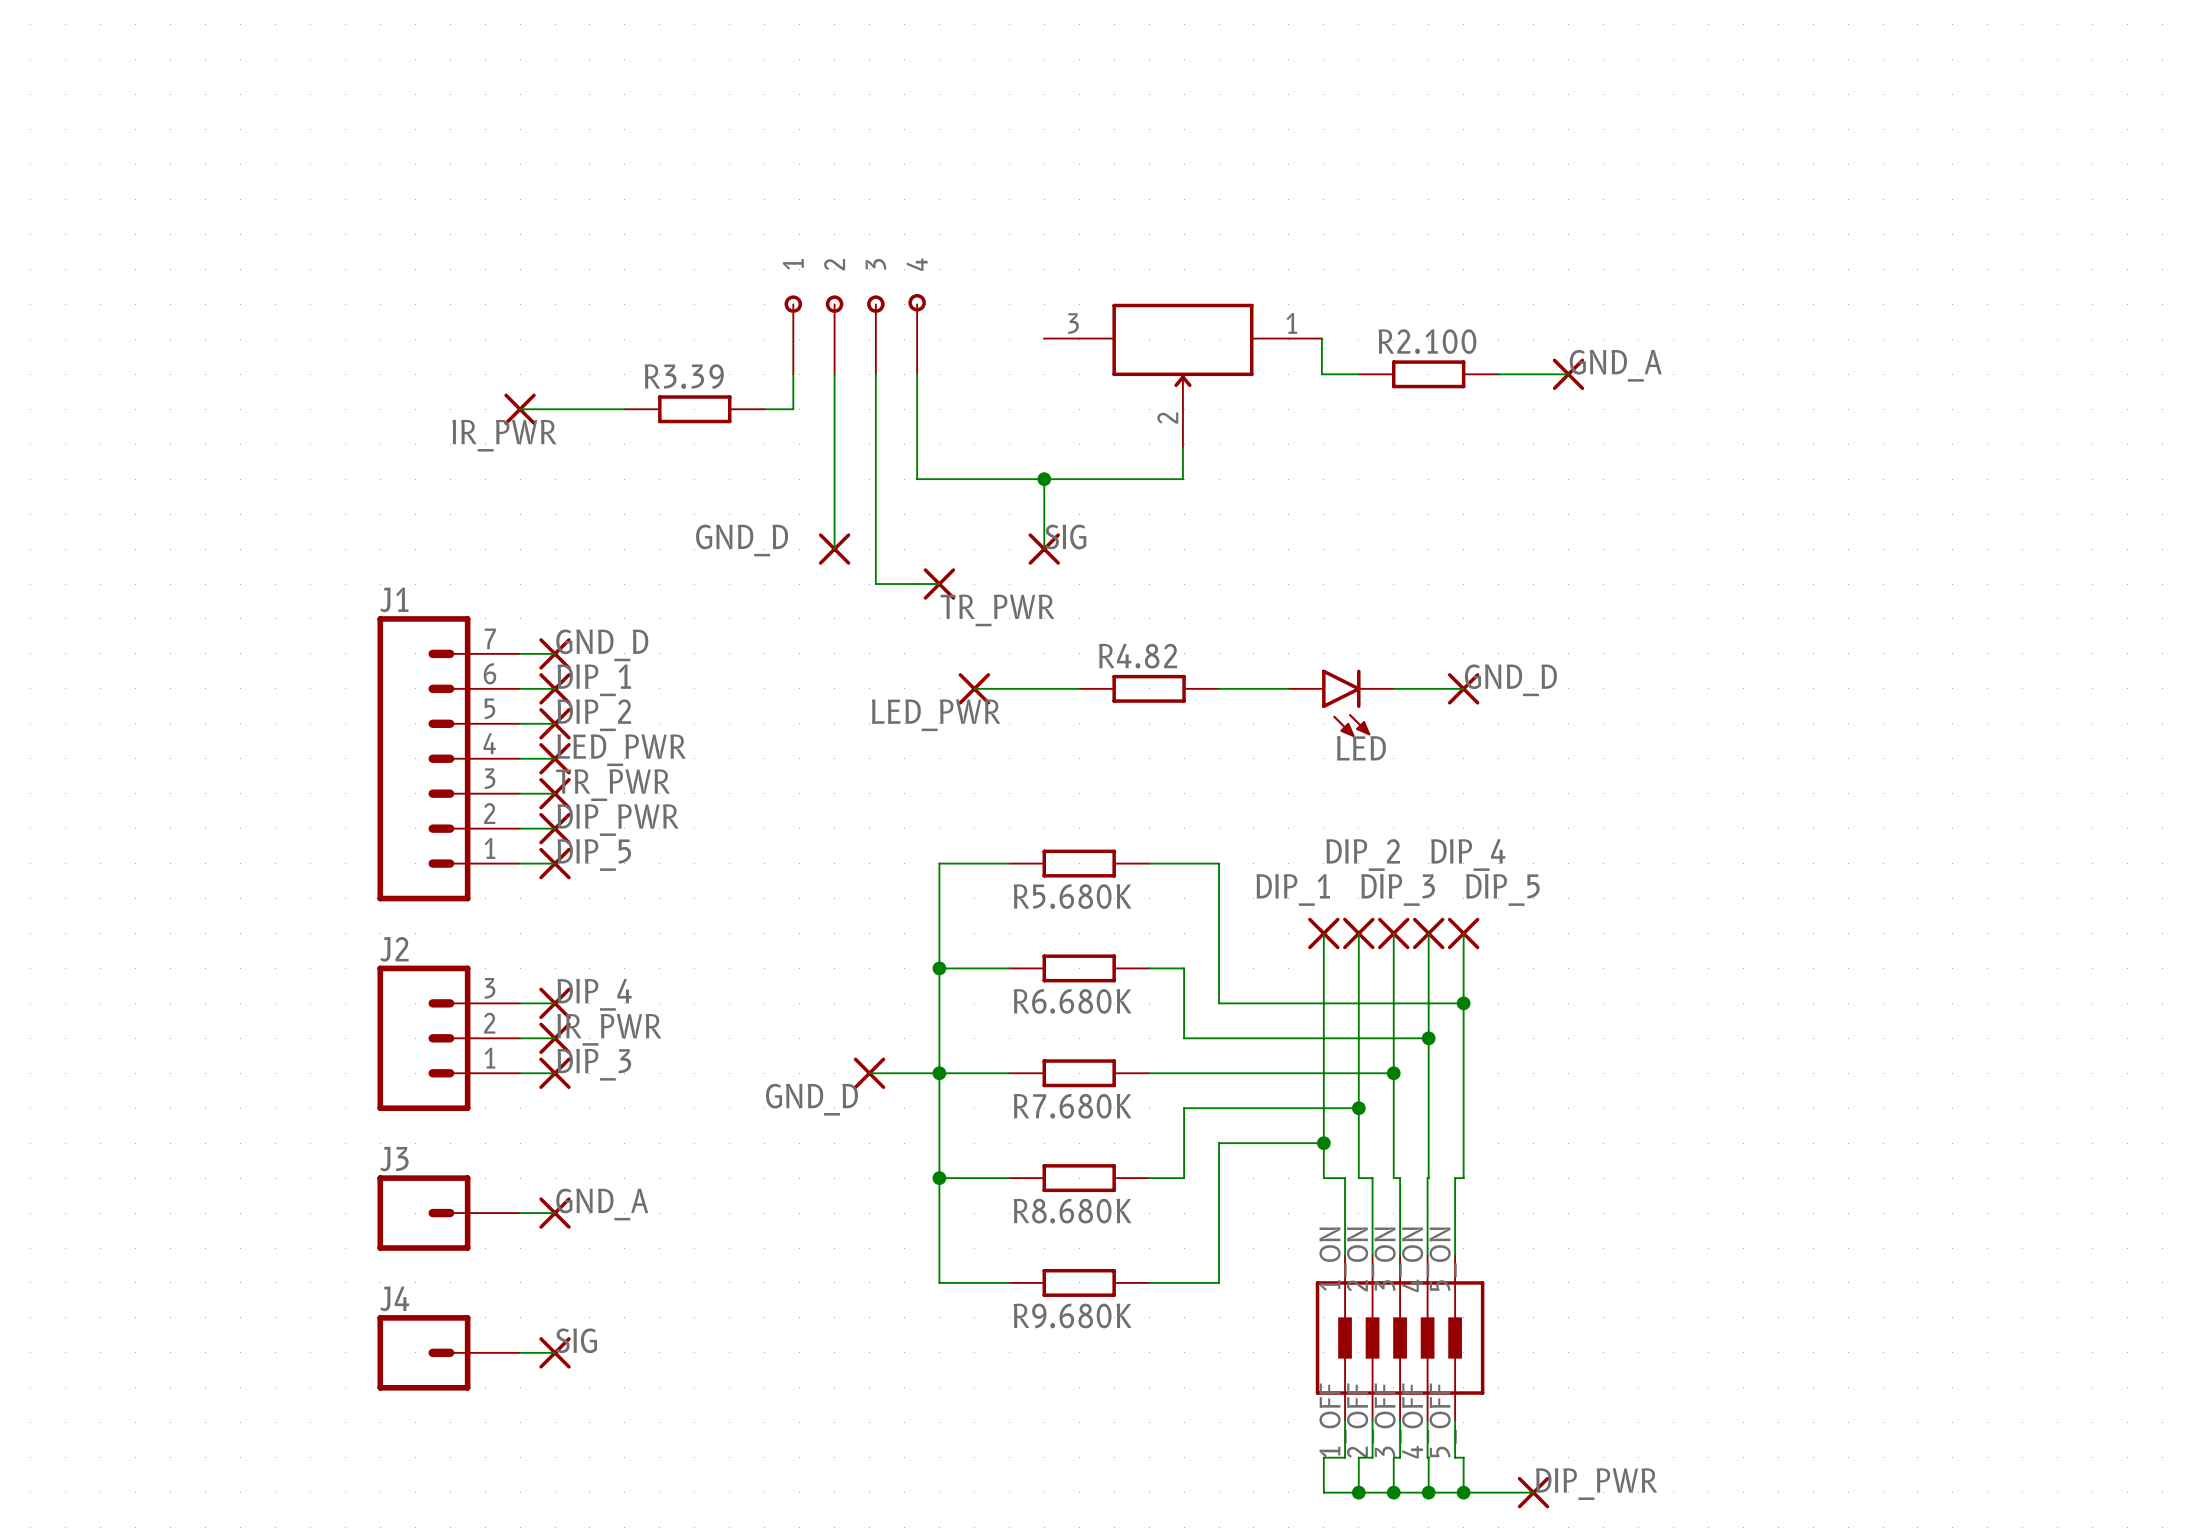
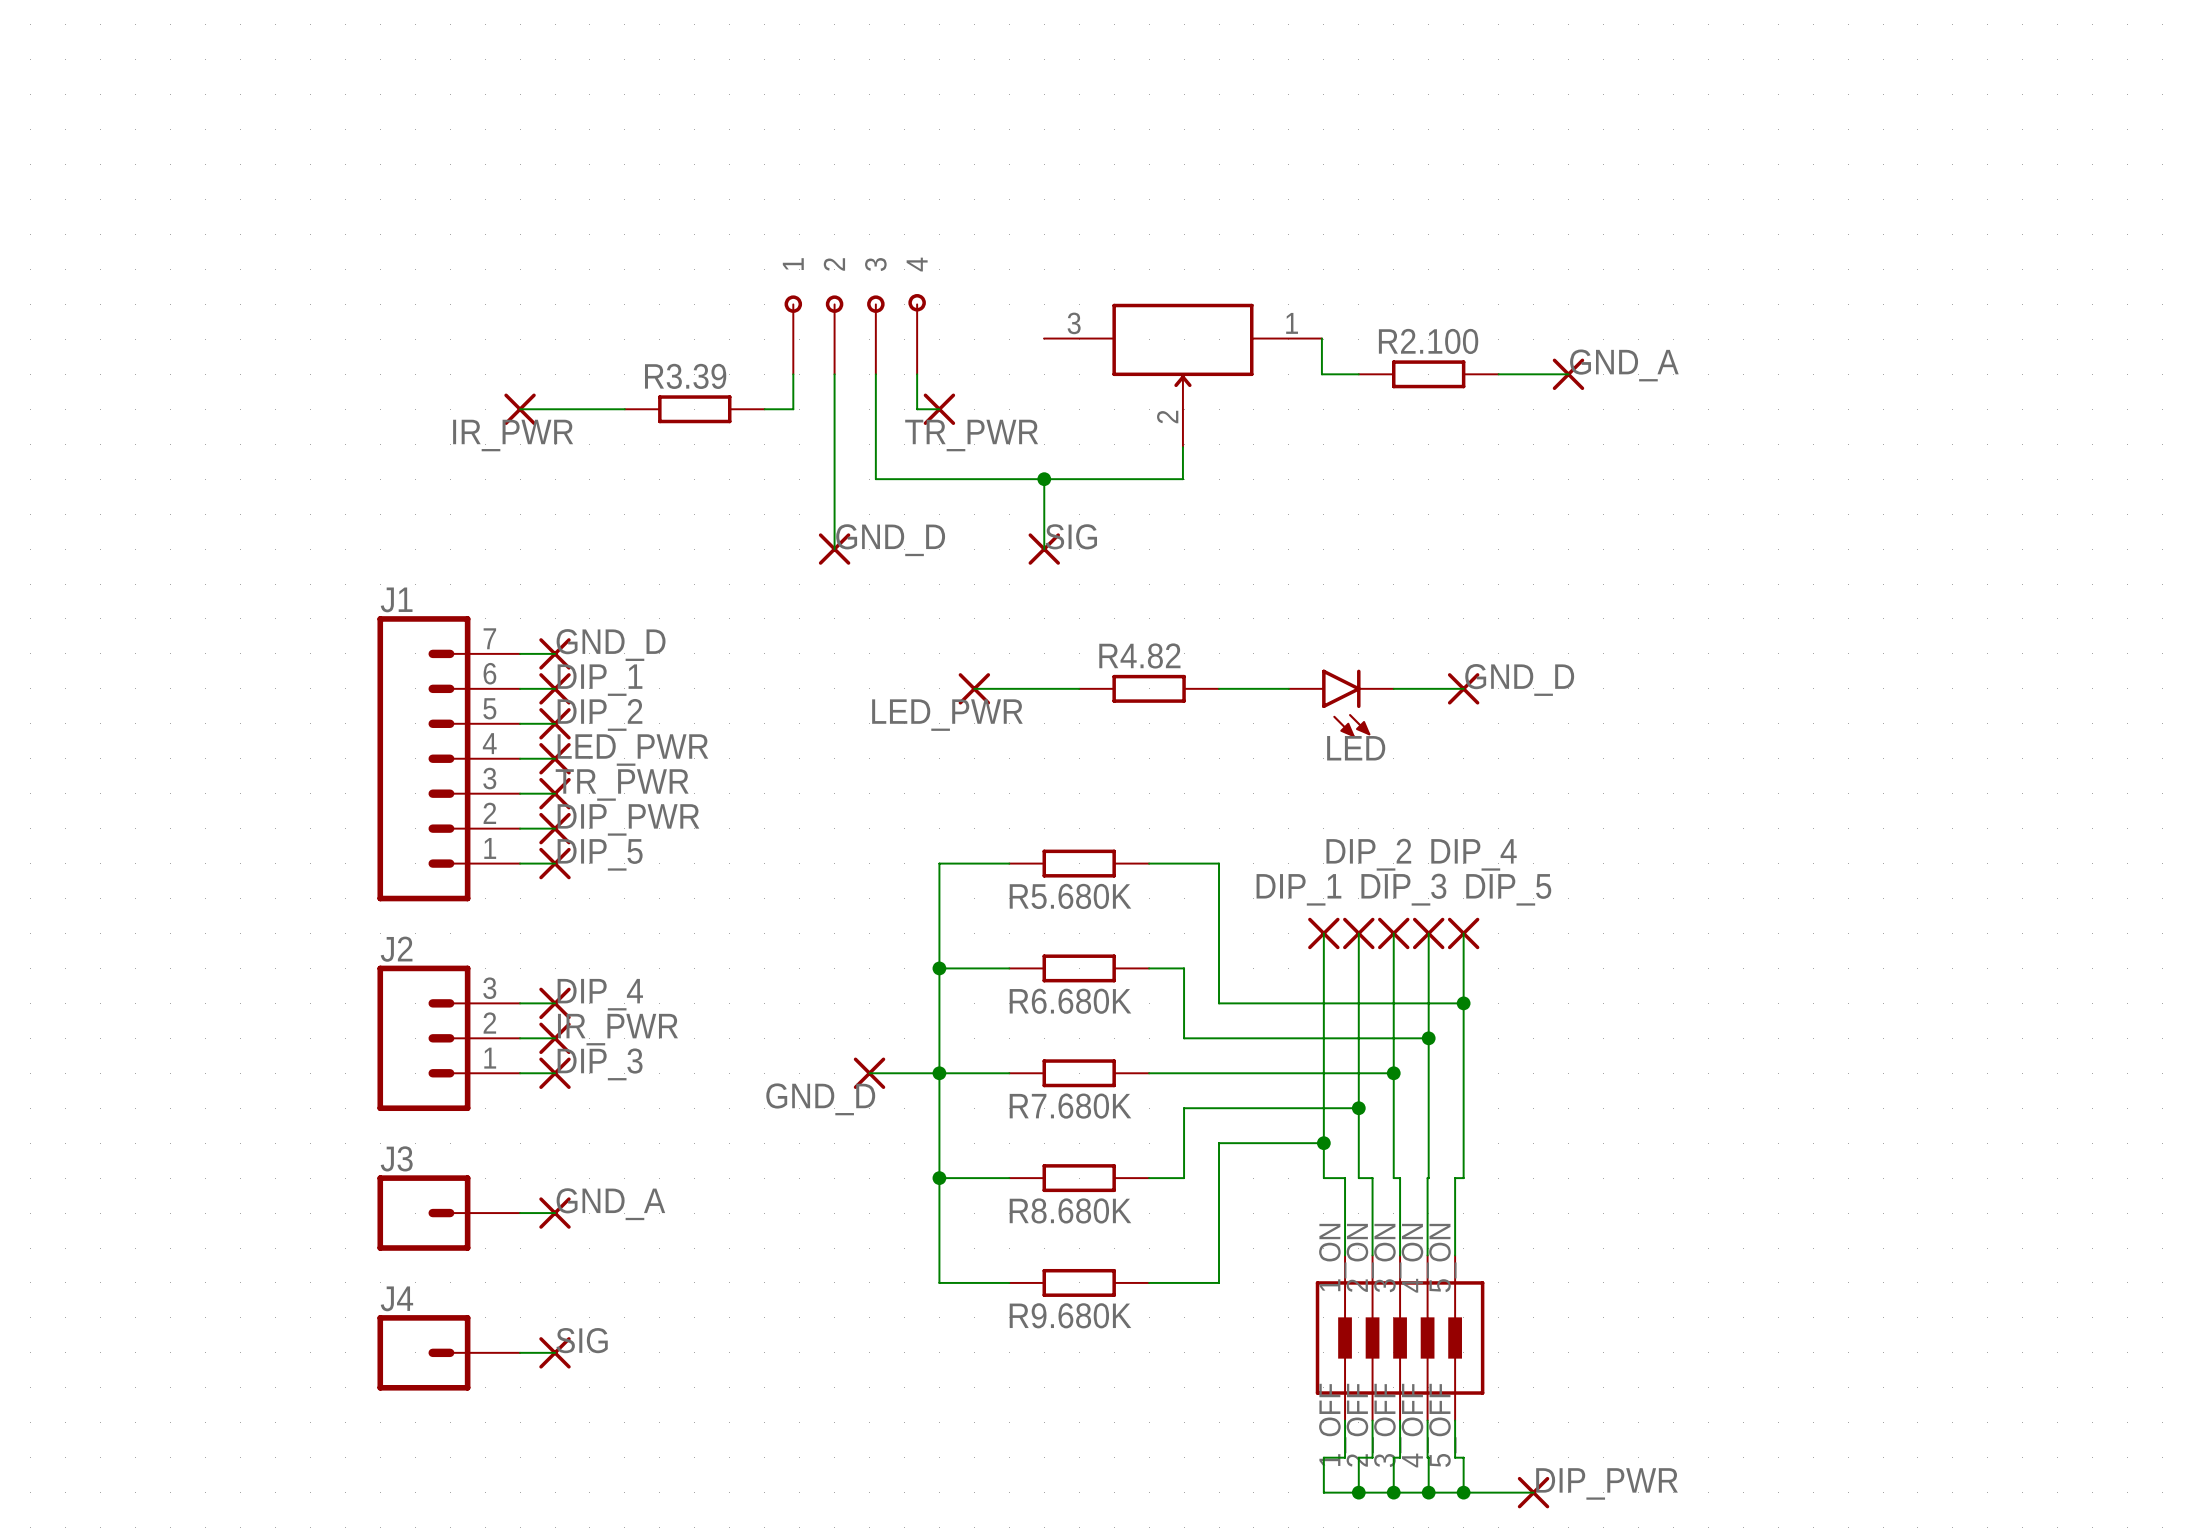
wire: (917, 409) (917, 479) -> (917, 409) (939, 409)
wire: (875, 479) (875, 584) (939, 584) -> (875, 479) (917, 479)
label position: GND_D (742, 540) -> GND_D (890, 540)
part position: (939, 584) -> (939, 409)
label position: TR_PWR (997, 610) -> TR_PWR (971, 435)

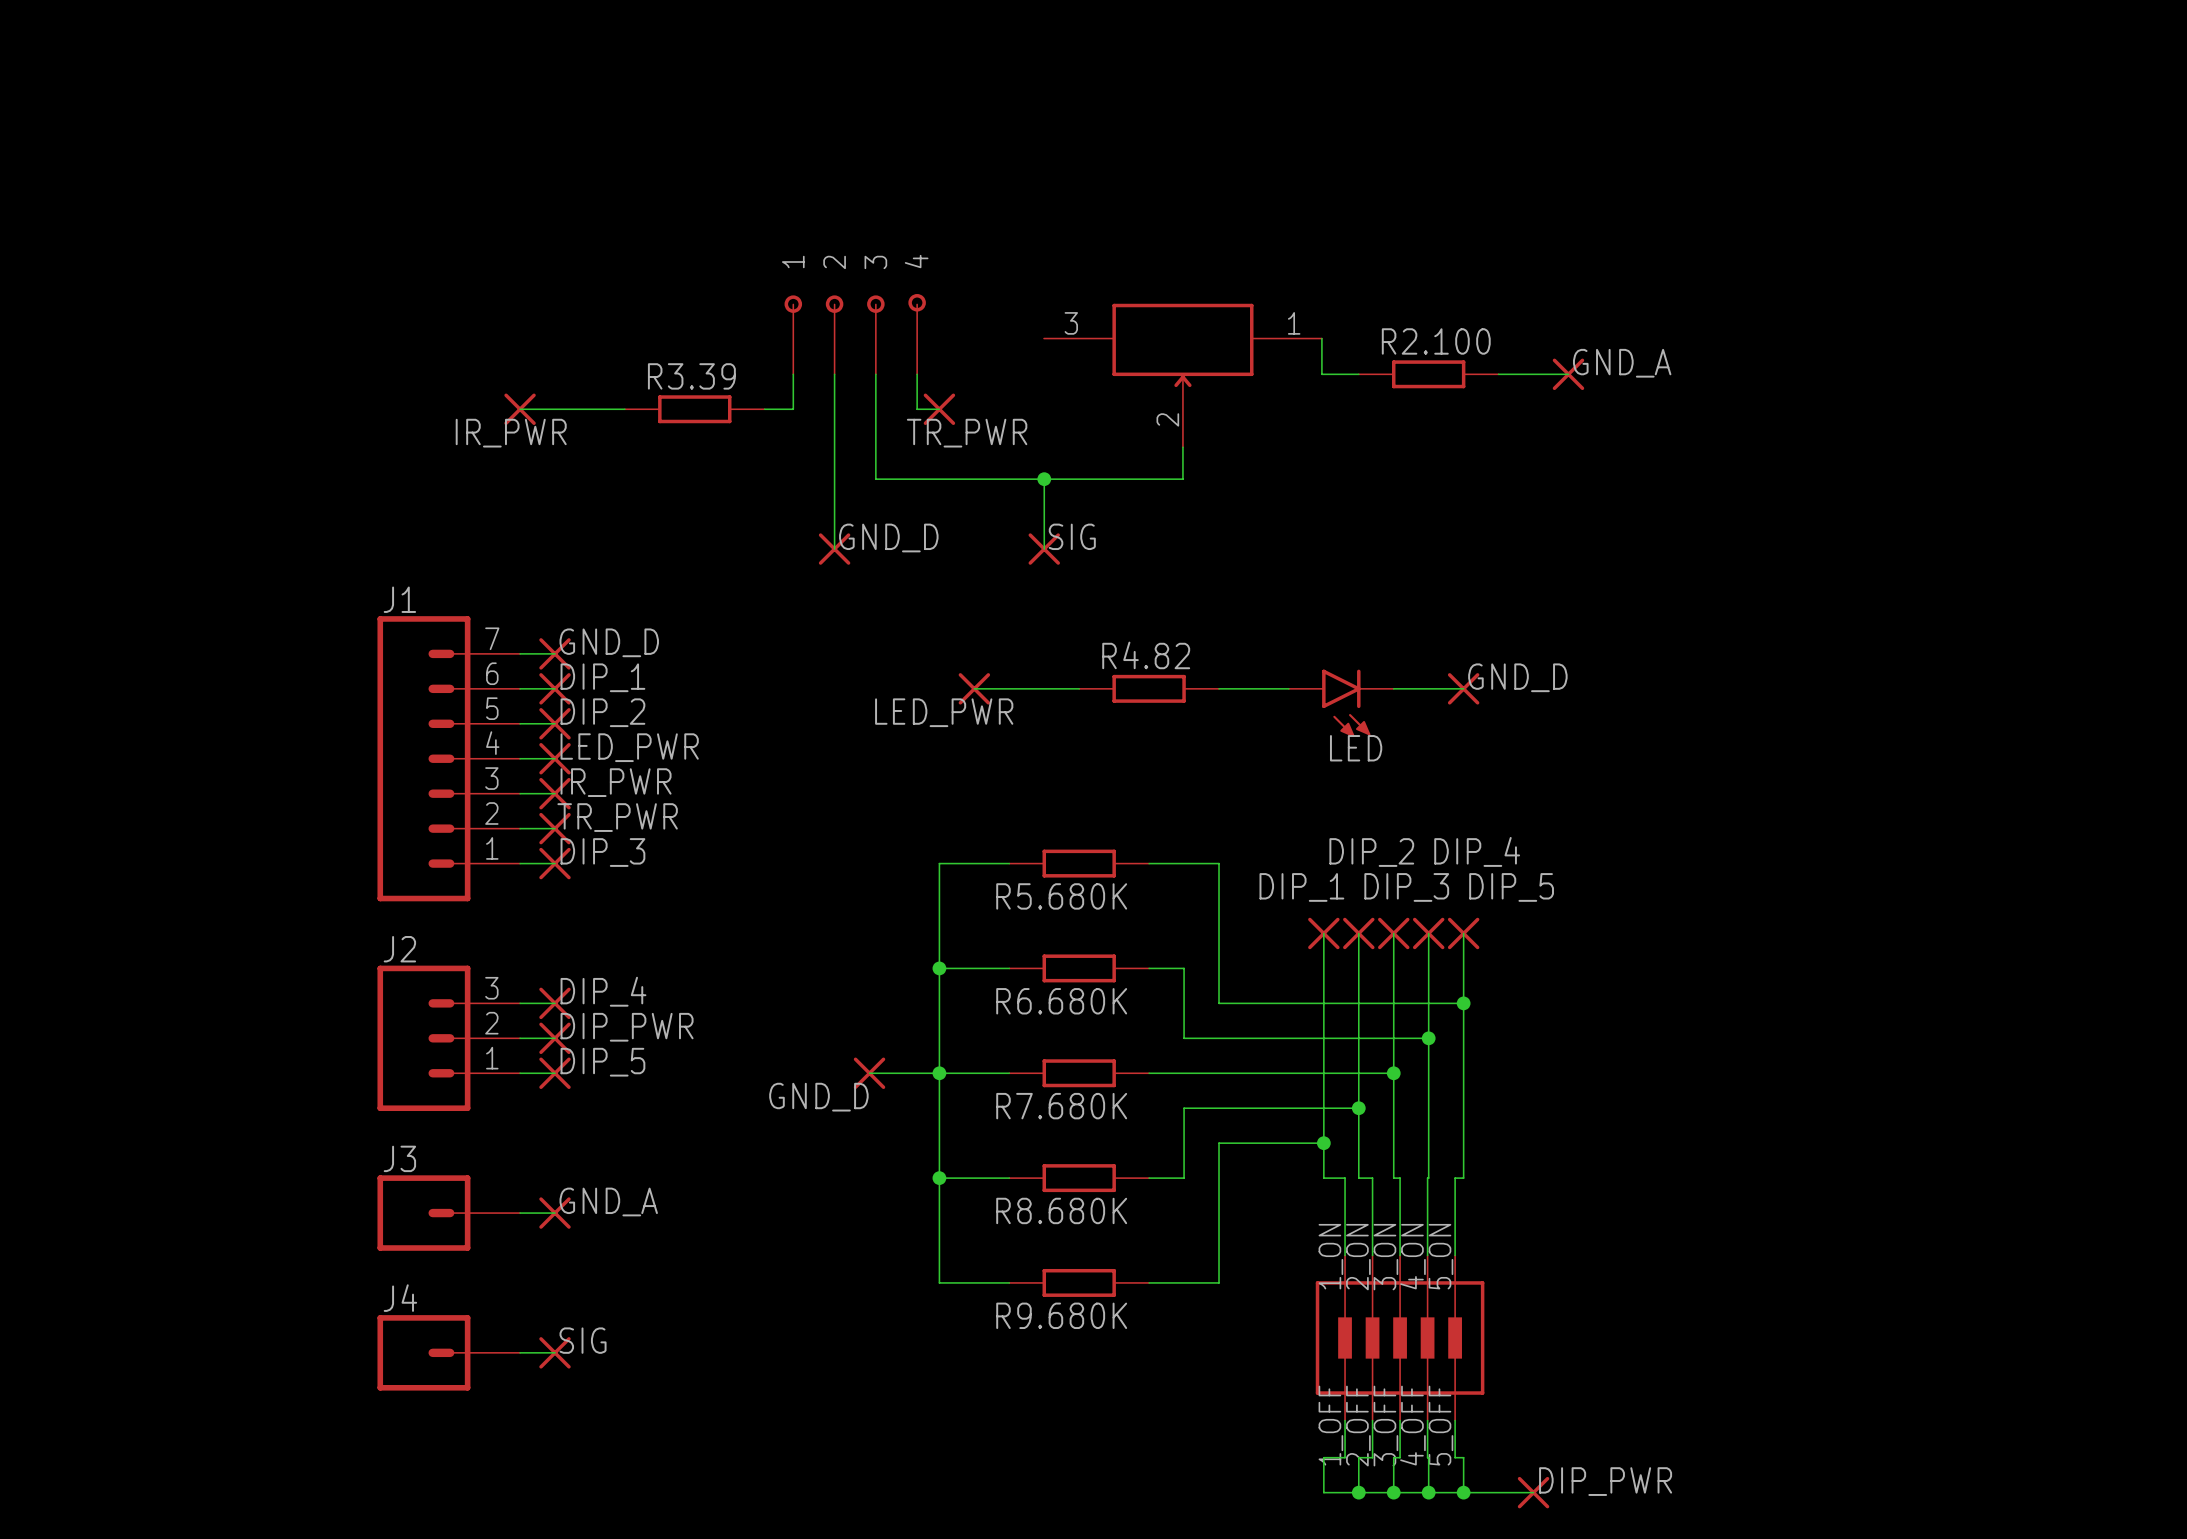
label: TR_PWR (622, 784) -> IR_PWR (616, 782)
label: DIP_PWR (628, 819) -> TR_PWR (617, 817)
label: DIP_5 (600, 854) -> DIP_3 (602, 852)
label: IR_PWR (617, 1029) -> DIP_PWR (627, 1027)
label: DIP_3 (600, 1064) -> DIP_5 (602, 1062)

